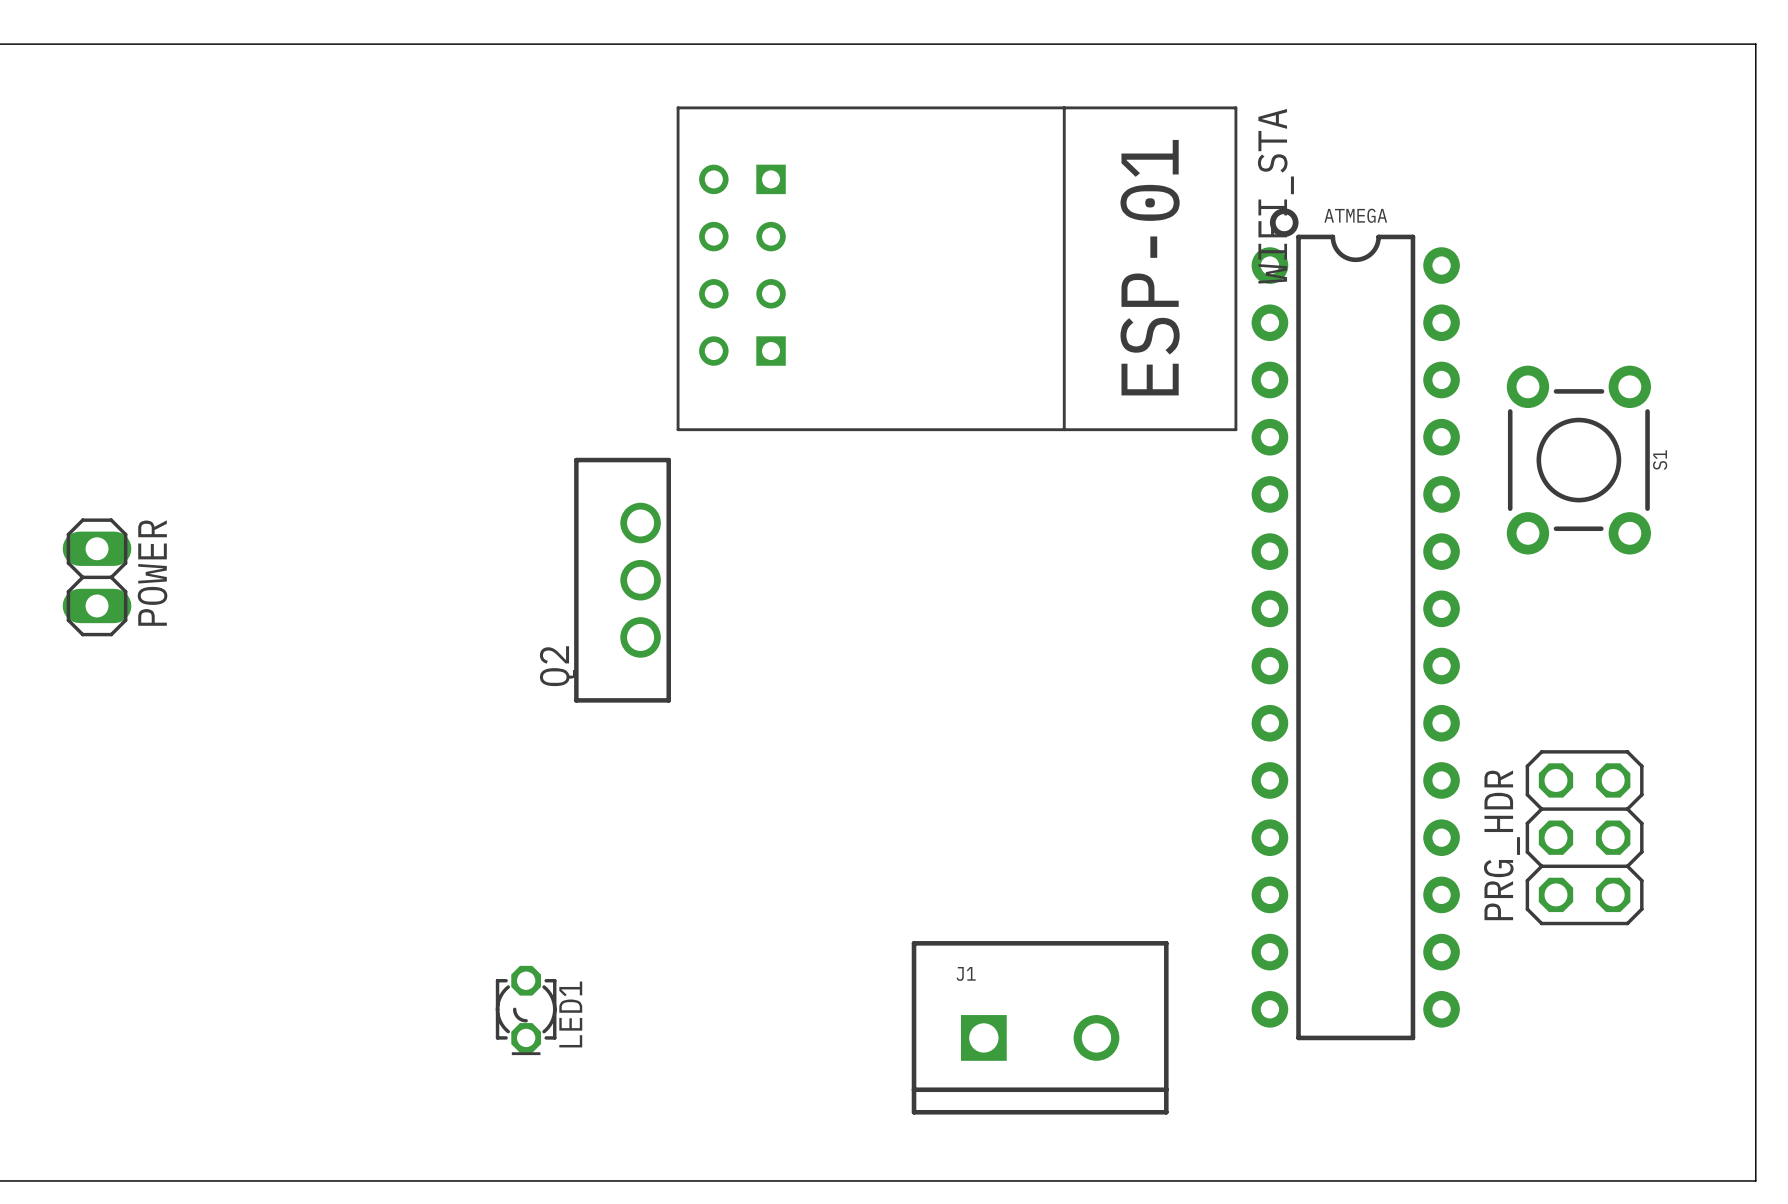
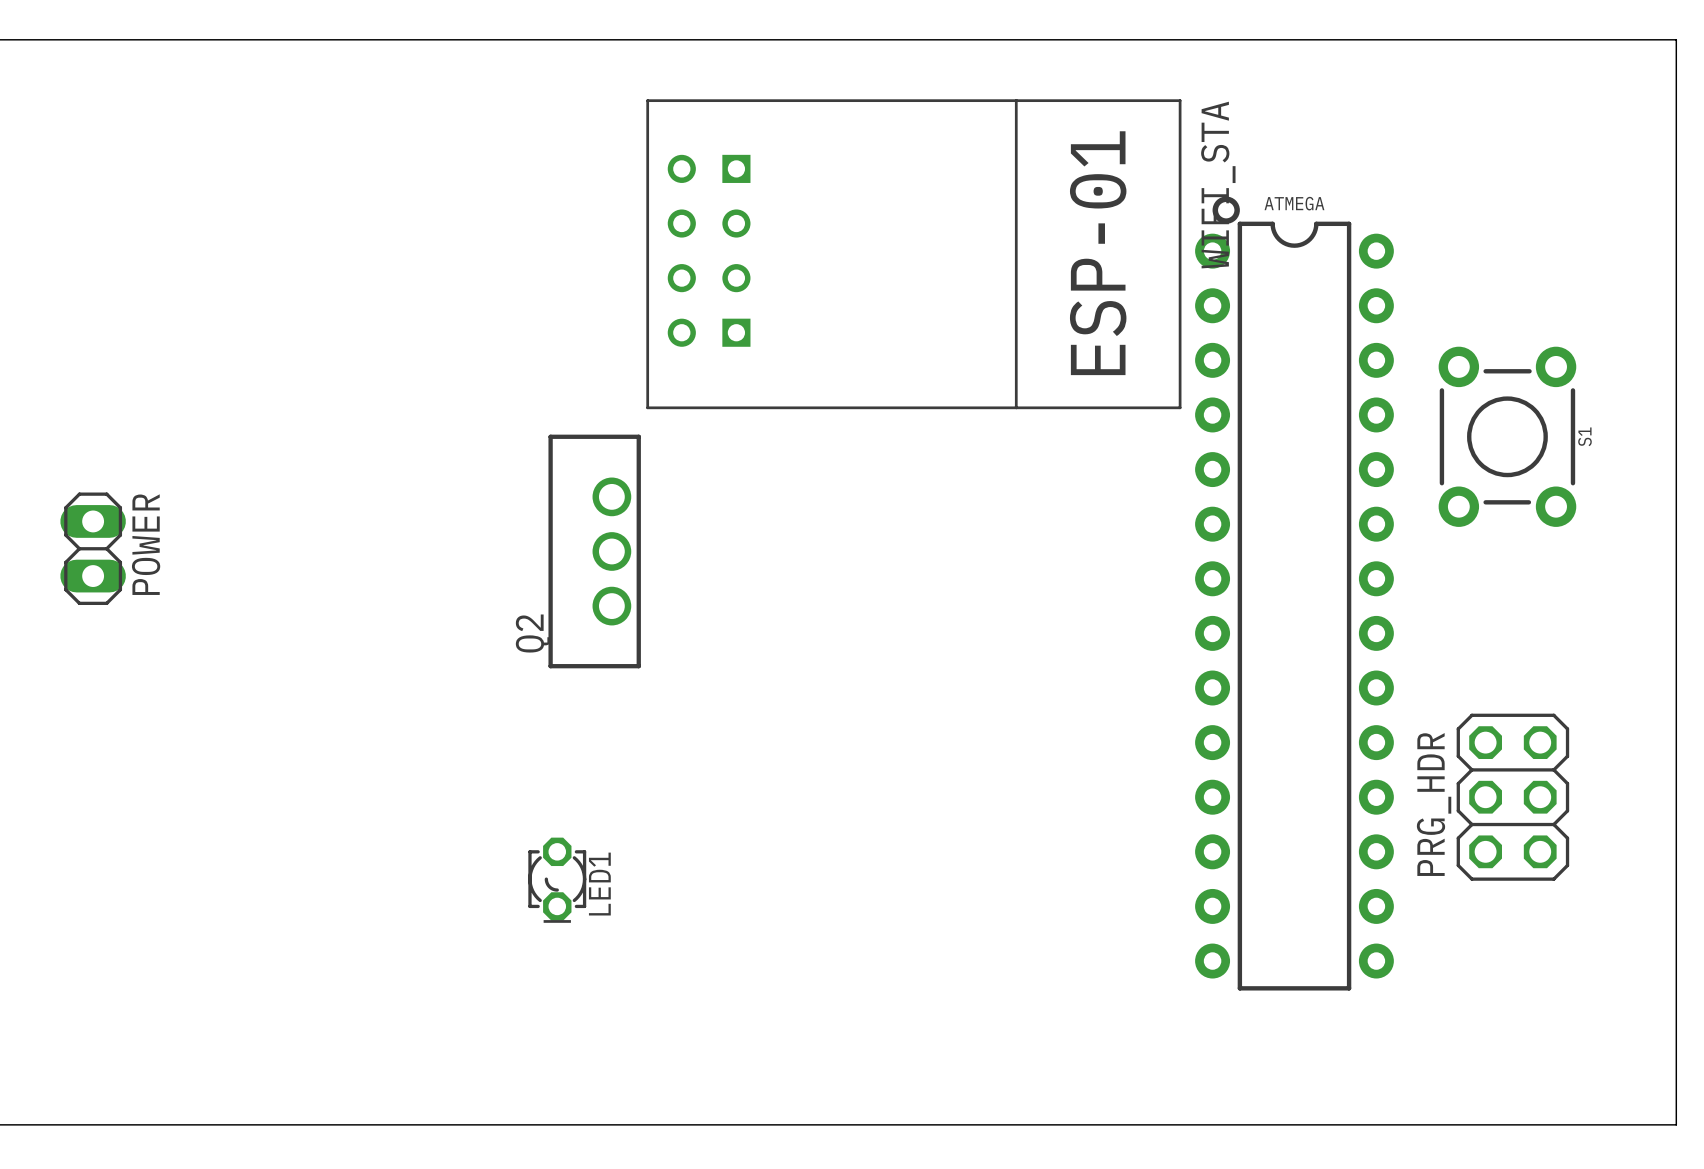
LED1 position: (526, 1010) -> (557, 880)
J1: (1040, 1027) -> none

